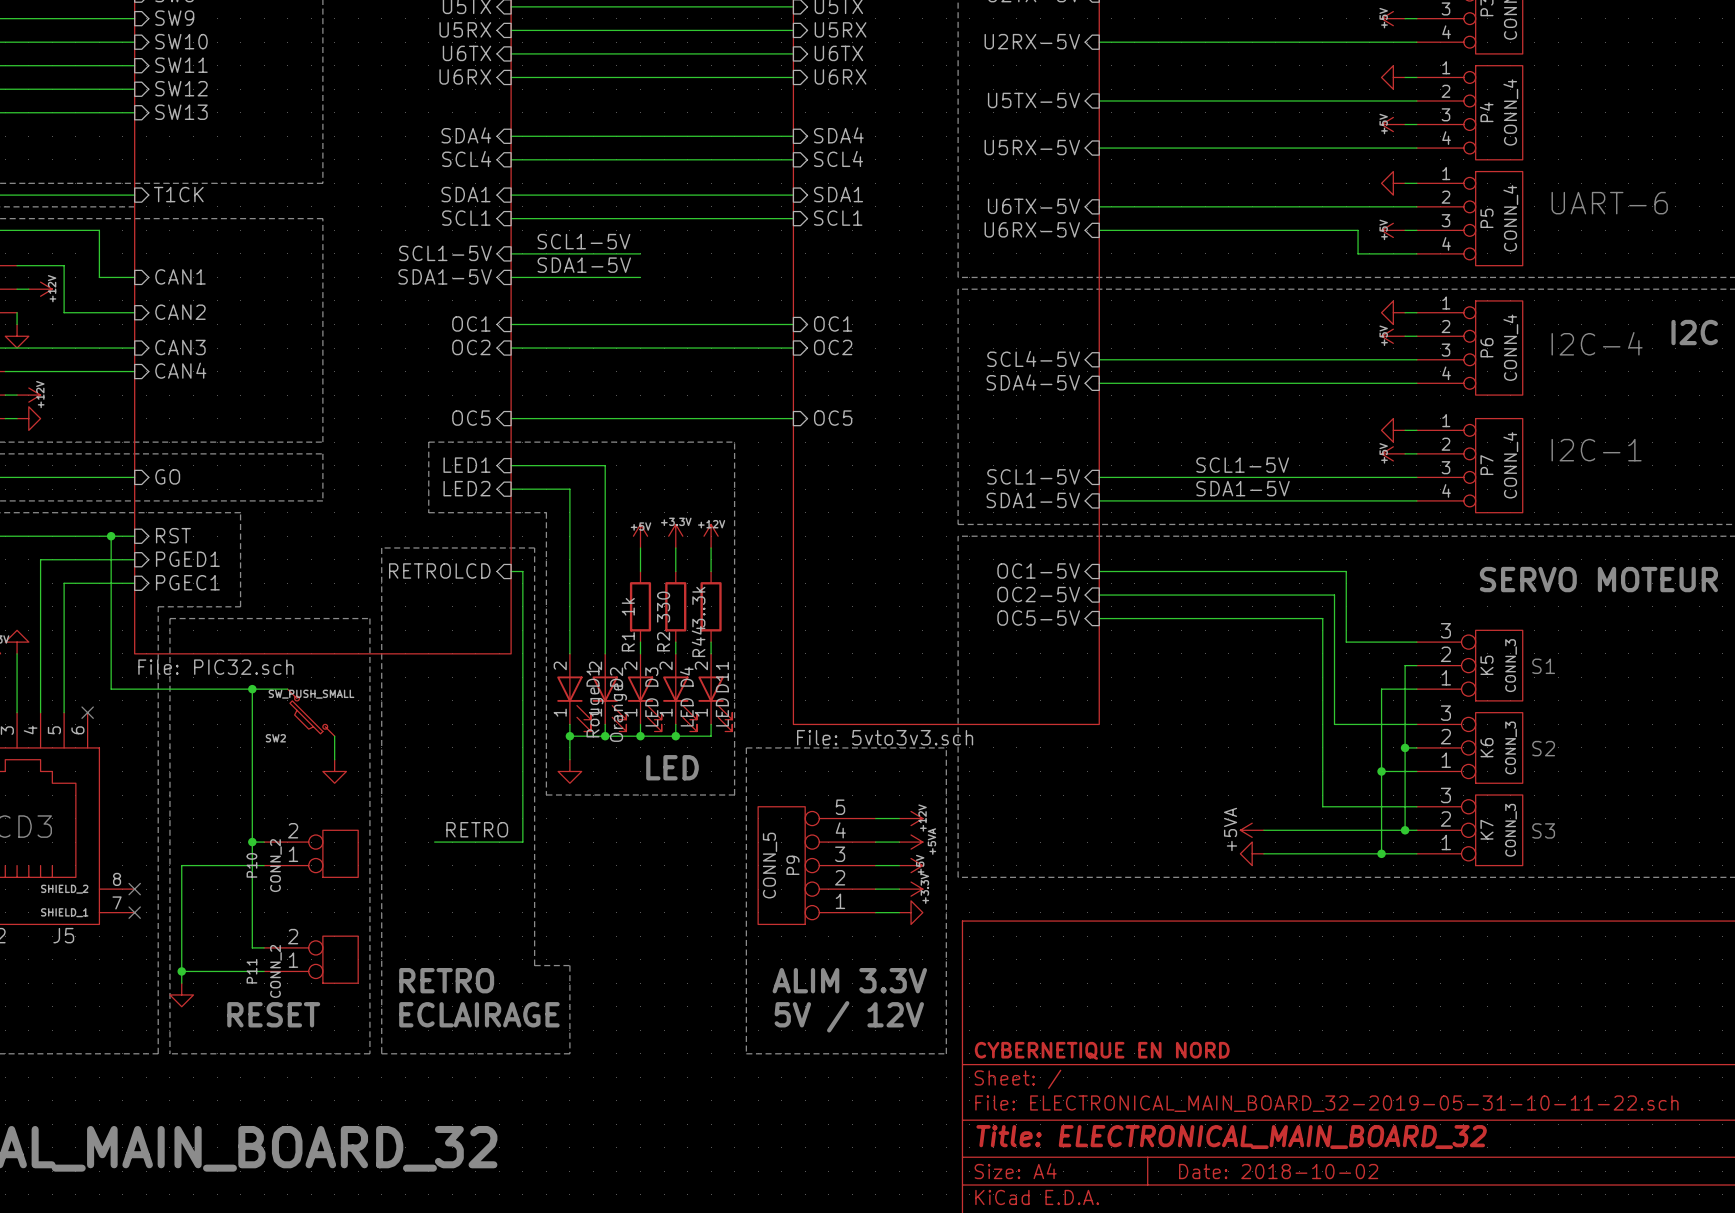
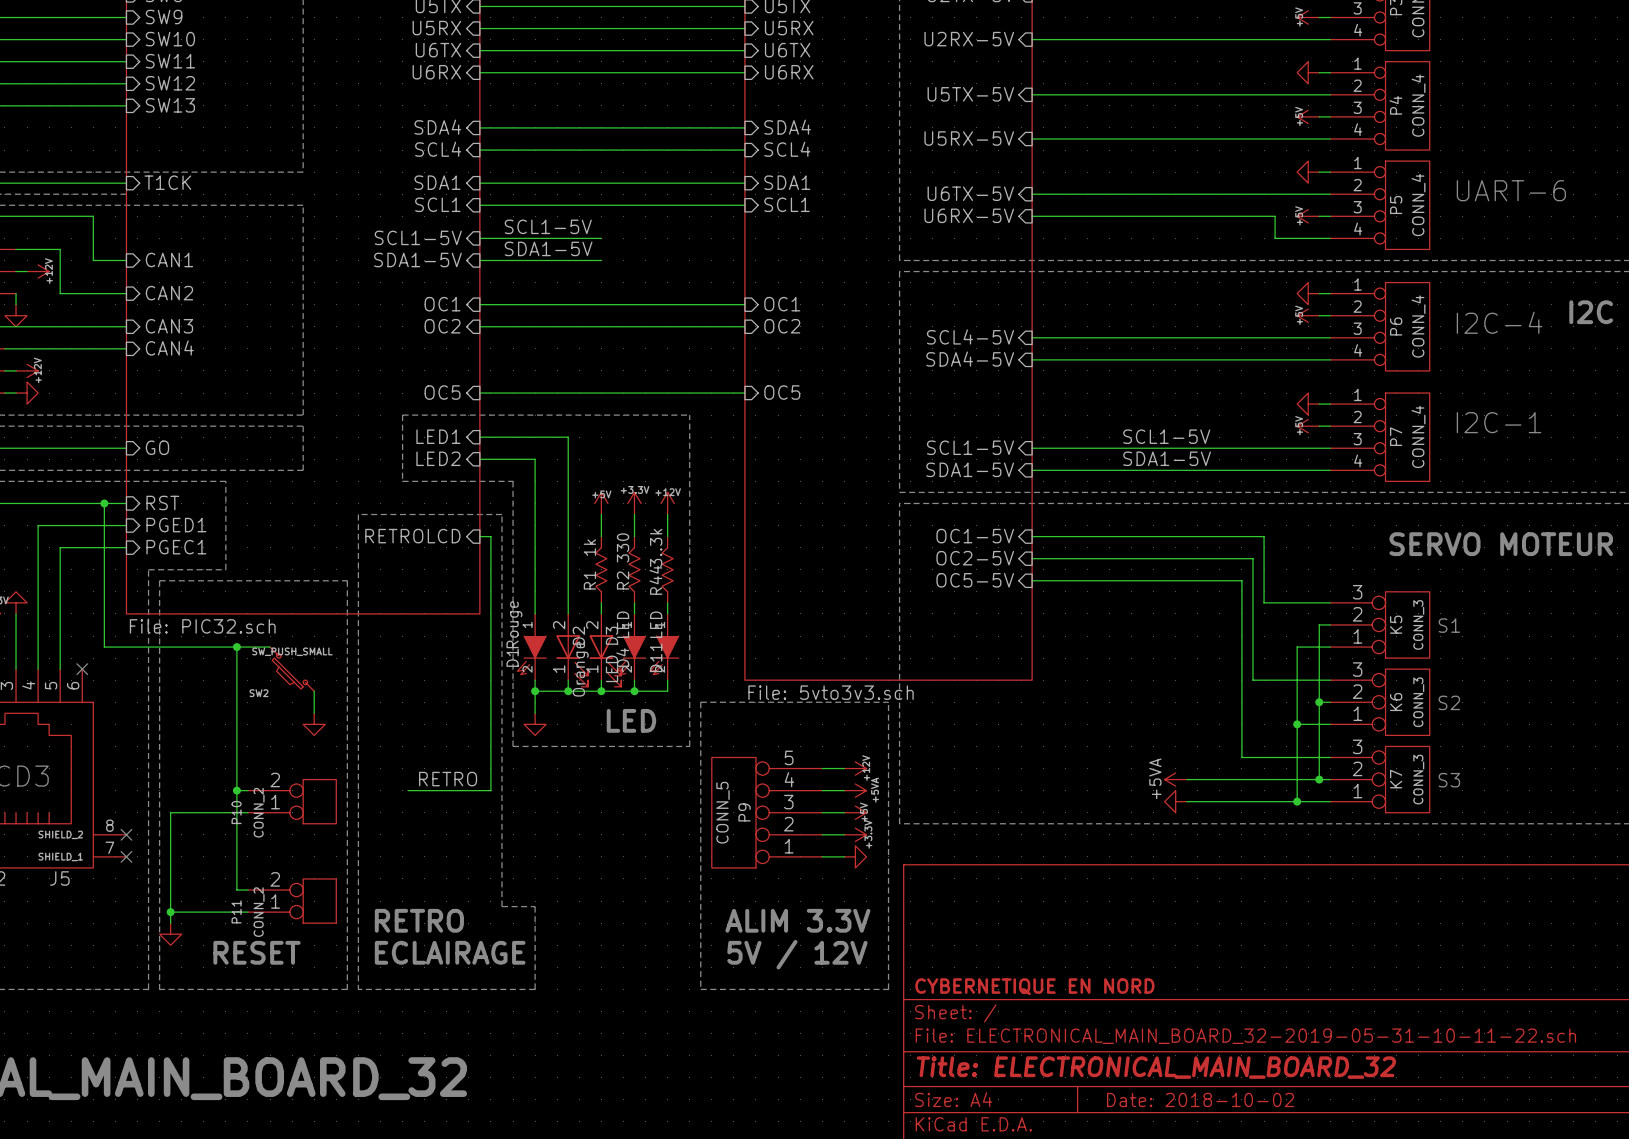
R1 symbol: [629, 571, 652, 643] -> [595, 536, 607, 603]
R2 symbol: [665, 571, 687, 643] -> [628, 536, 641, 603]
R44 symbol: [700, 571, 722, 643] -> [662, 536, 674, 603]
R1 value position: 1k (628, 606) -> 1k (589, 547)
R2 value position: 330 (663, 607) -> 330 (623, 547)
R44 value position: 3..3k (698, 607) -> 3..3k (656, 547)
R1 name position: R1 (628, 641) -> R1 (589, 580)
R2 name position: R2 (663, 641) -> R2 (623, 580)
R44 name position: R44 (698, 641) -> R44 (655, 580)
D1 symbol: [557, 653, 592, 732] -> [517, 613, 547, 681]
D4 symbol: [663, 653, 697, 732] -> [616, 613, 646, 681]
D11 symbol: [698, 653, 733, 732] -> [649, 613, 679, 681]
D4 name position: D4 (686, 676) -> D4 (622, 657)
D1 name position: D1 (593, 677) -> D1 (512, 657)
D11 name position: D11 (722, 677) -> D11 (656, 657)
D1 value position: Rouge (594, 712) -> Rouge (514, 624)
D4 value position: LED (687, 712) -> LED (623, 624)
D11 value position: LED (722, 712) -> LED (656, 624)

